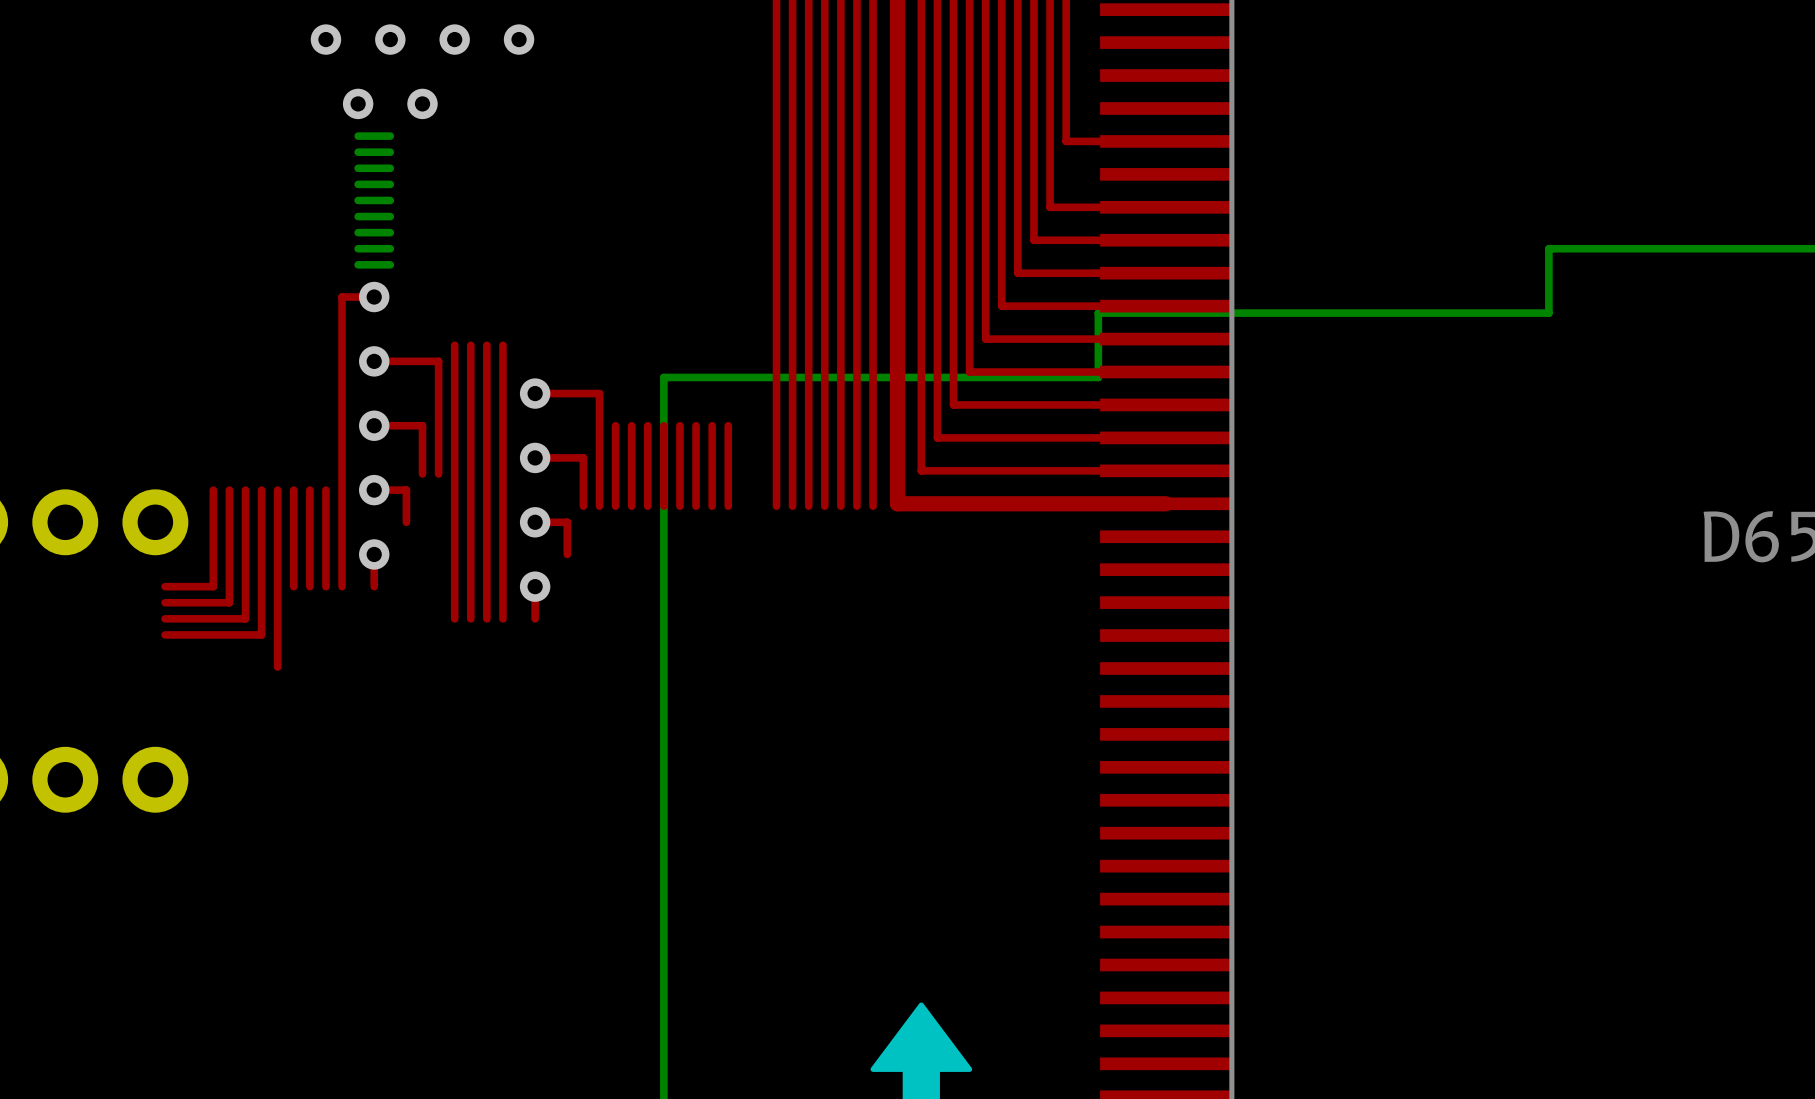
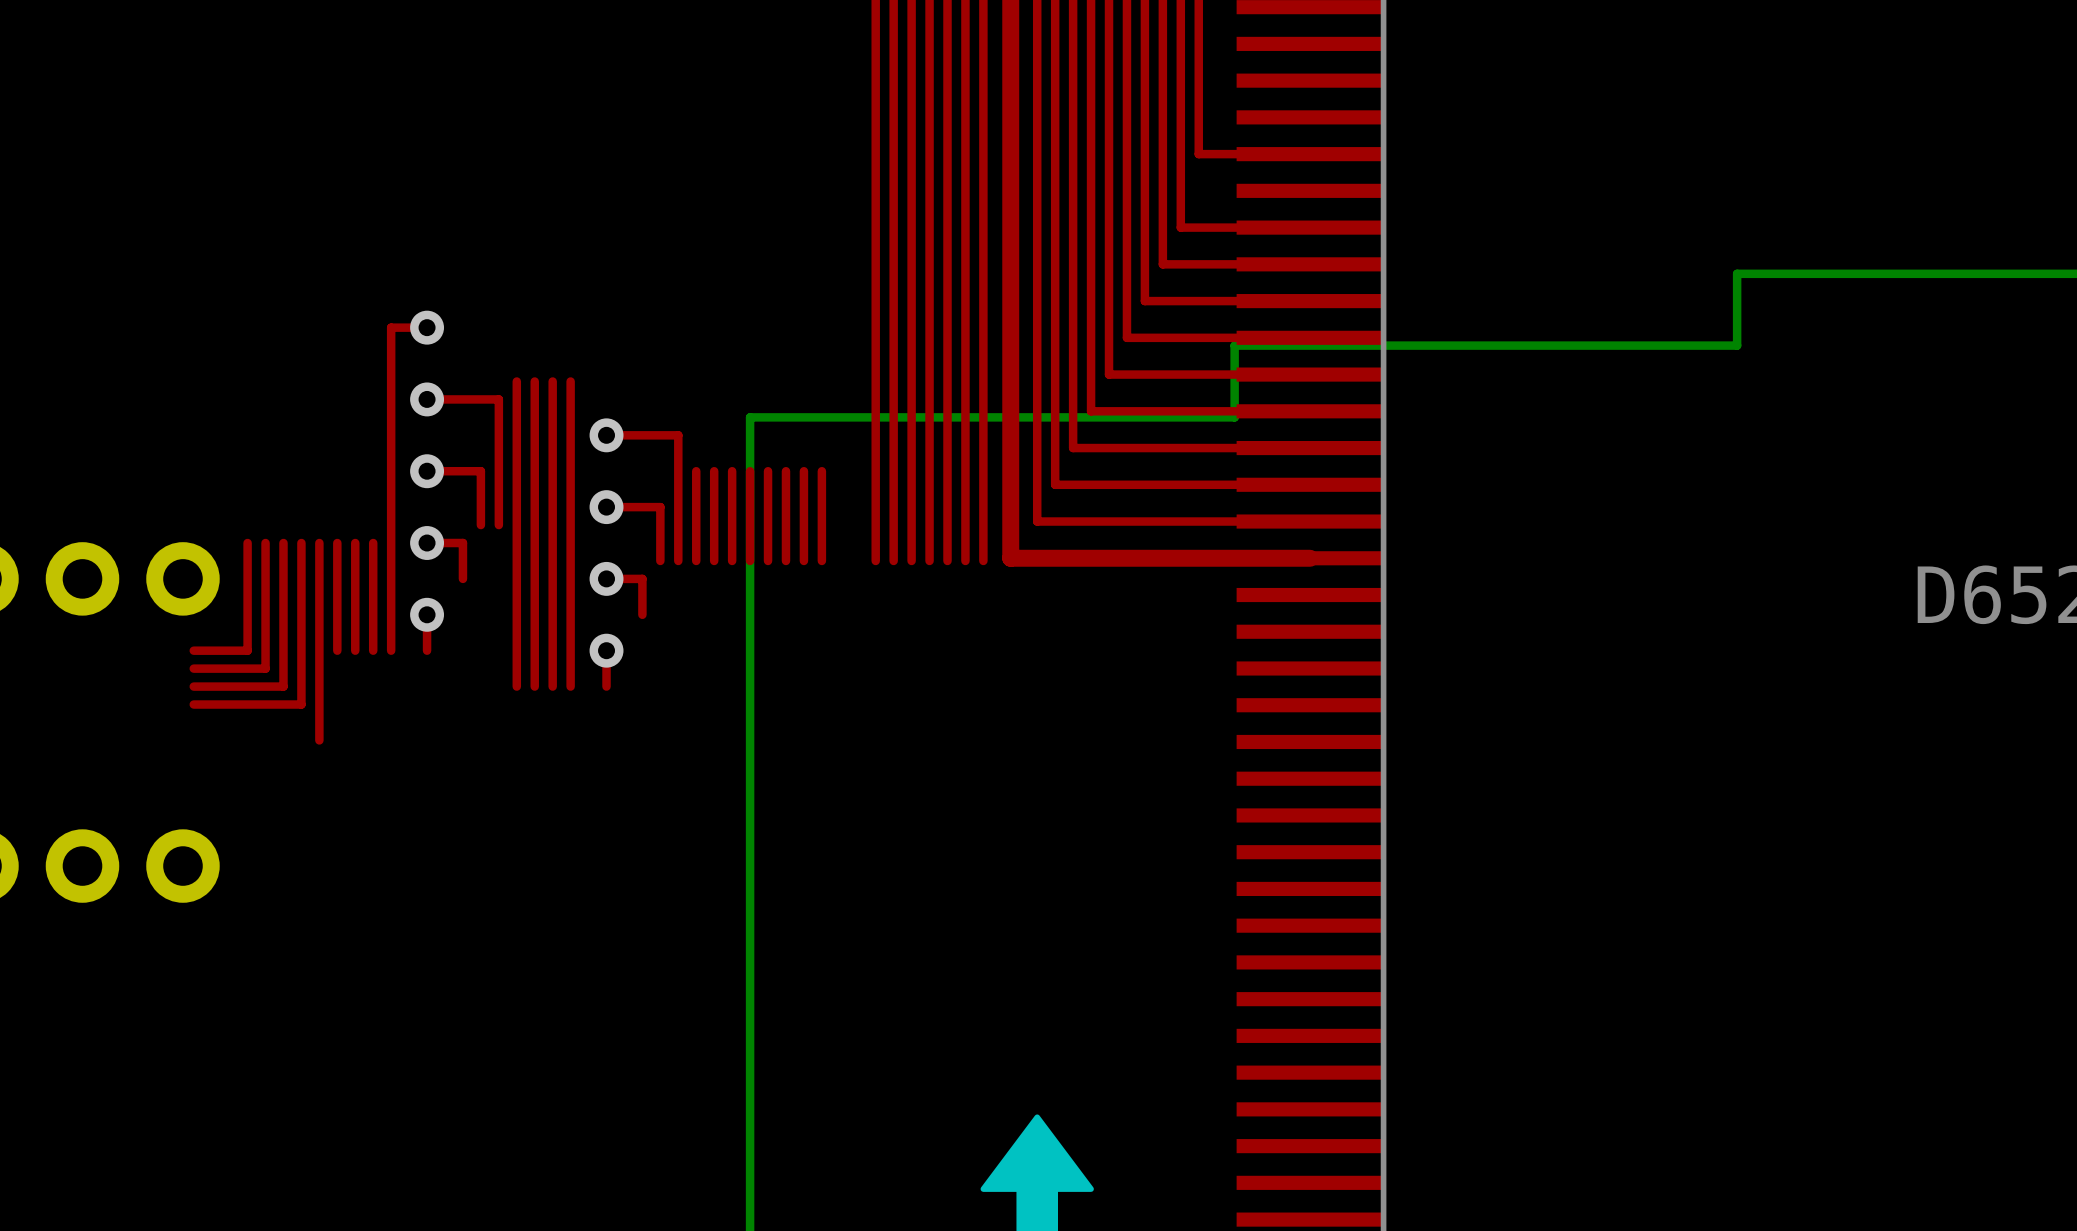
via: (325, 39) -> none
via: (390, 39) -> none
via: (454, 39) -> none
via: (519, 39) -> none
via: (358, 103) -> none
via: (422, 103) -> none
bottom track: (358, 136) (390, 136) -> none
bottom track: (358, 152) (390, 152) -> none
bottom track: (358, 168) (390, 168) -> none
bottom track: (358, 184) (390, 184) -> none
bottom track: (358, 200) (390, 200) -> none
bottom track: (358, 216) (390, 216) -> none
bottom track: (358, 232) (390, 232) -> none
bottom track: (358, 248) (390, 248) -> none
bottom track: (358, 264) (390, 264) -> none

